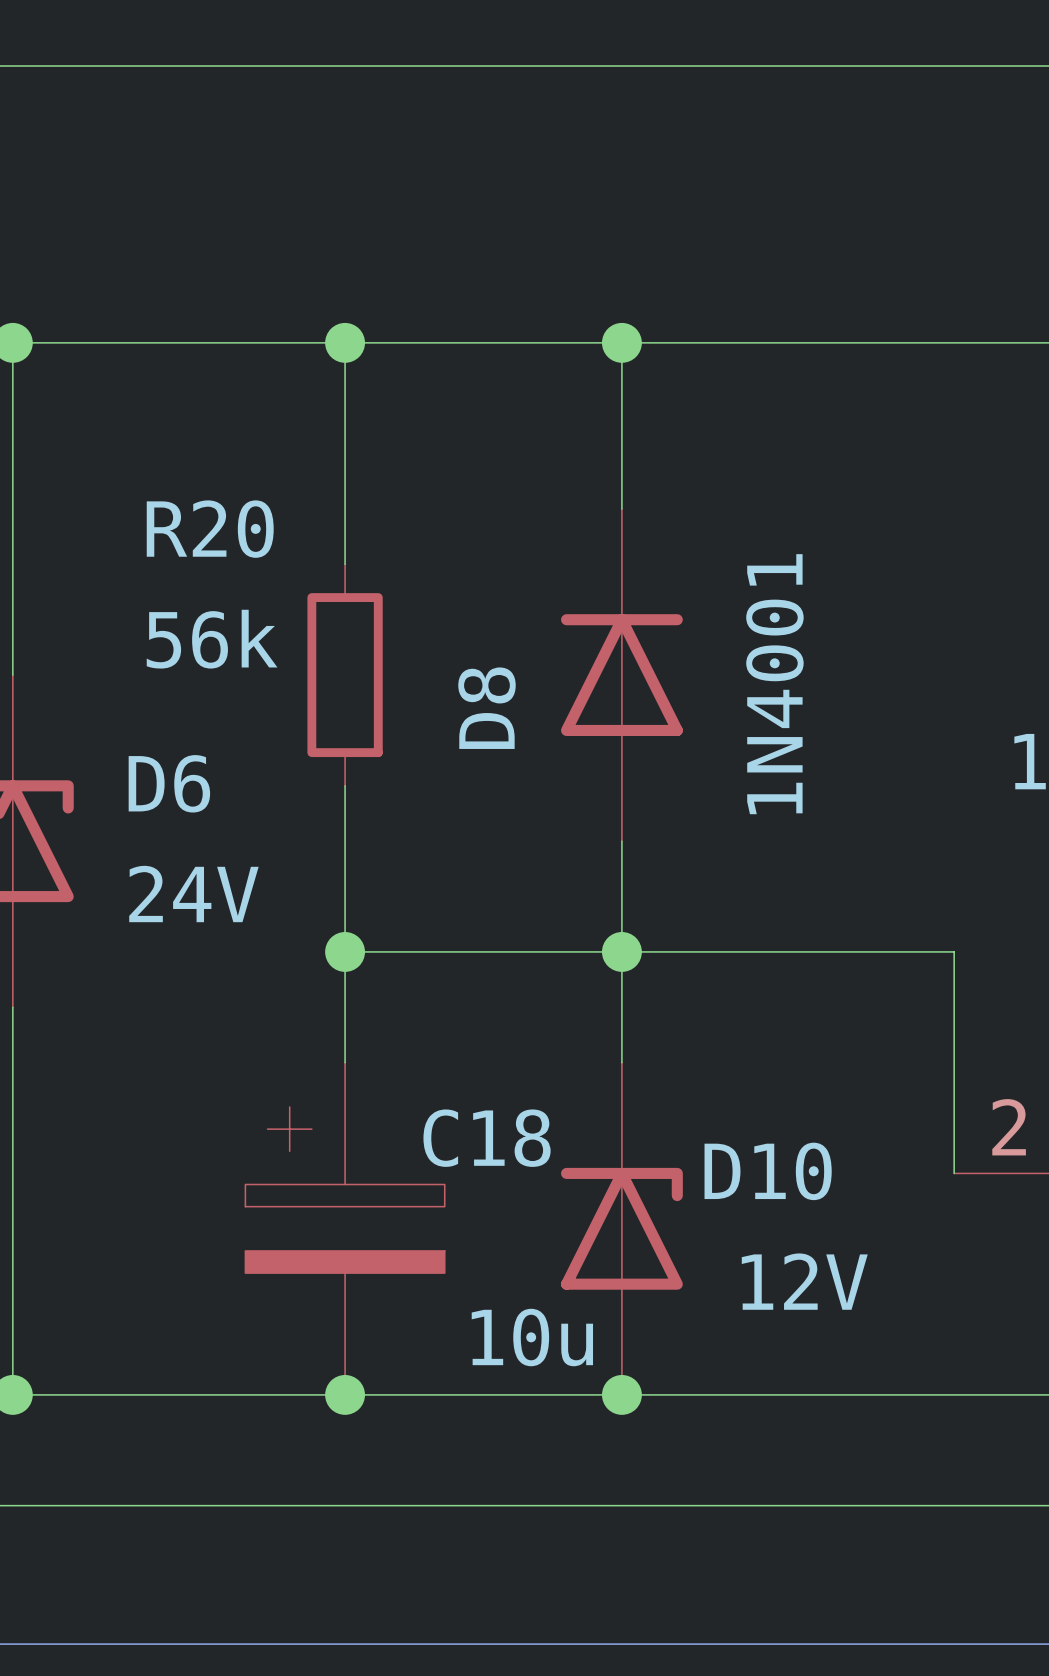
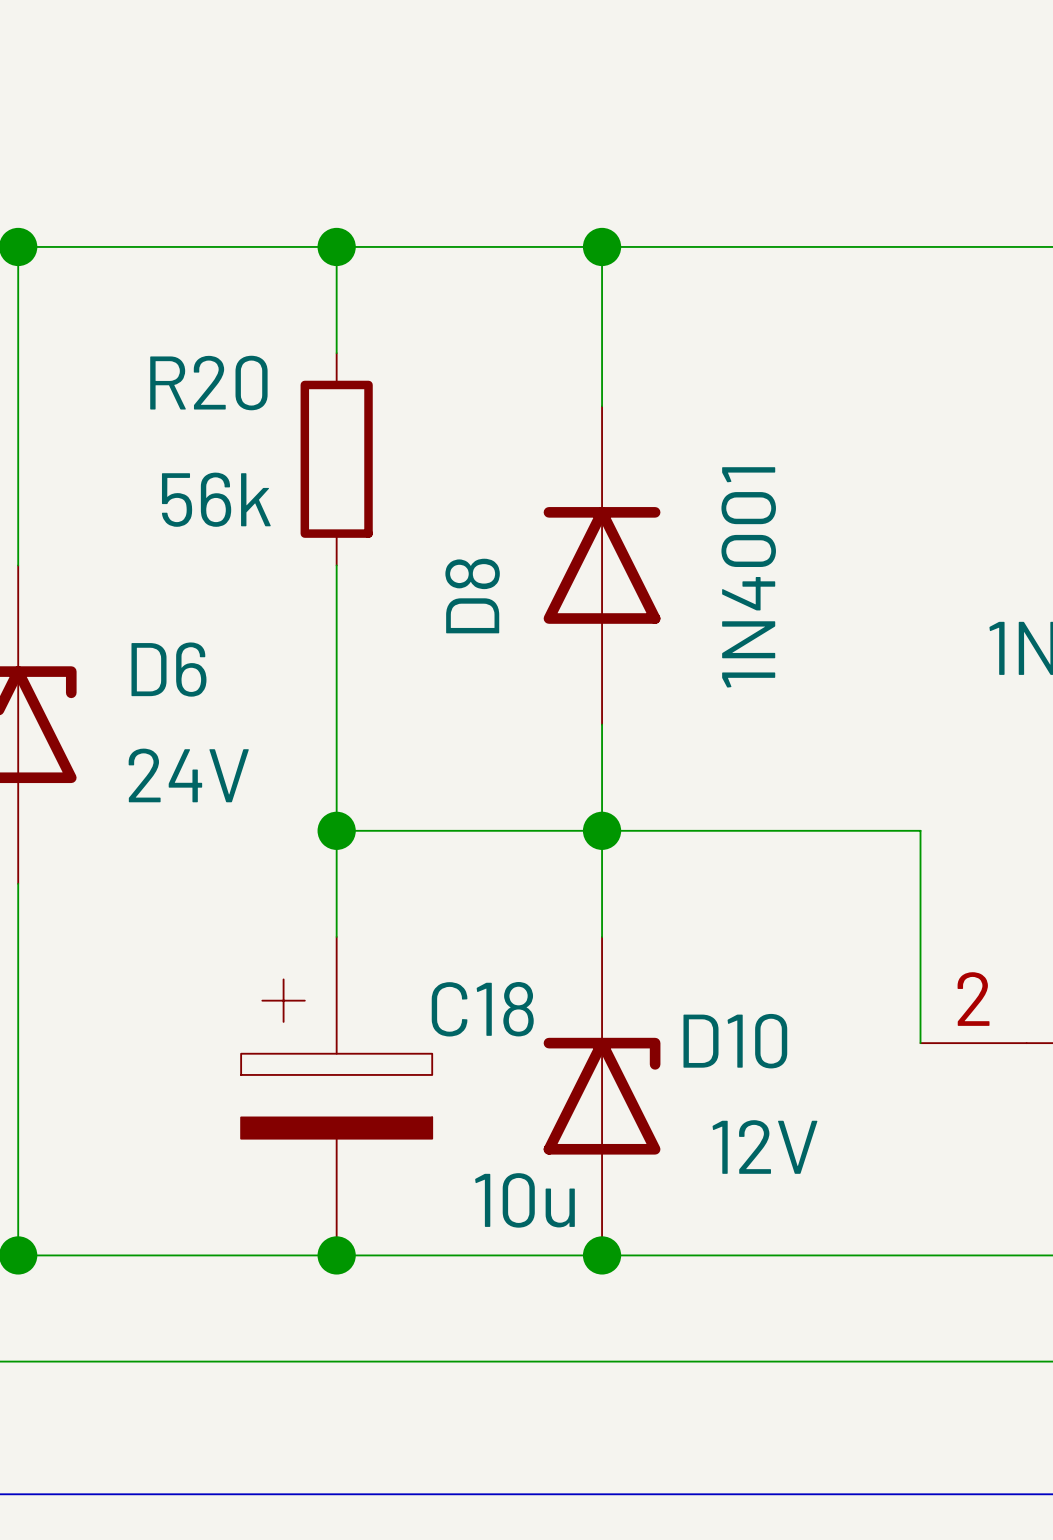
wire: (345, 453) (345, 564) -> (336, 565) (336, 671)
R20 name position: R20 (210, 529) -> R20 (208, 383)
R20 value position: 56k (212, 639) -> 56k (216, 499)
R20 position: (345, 675) -> (336, 459)

